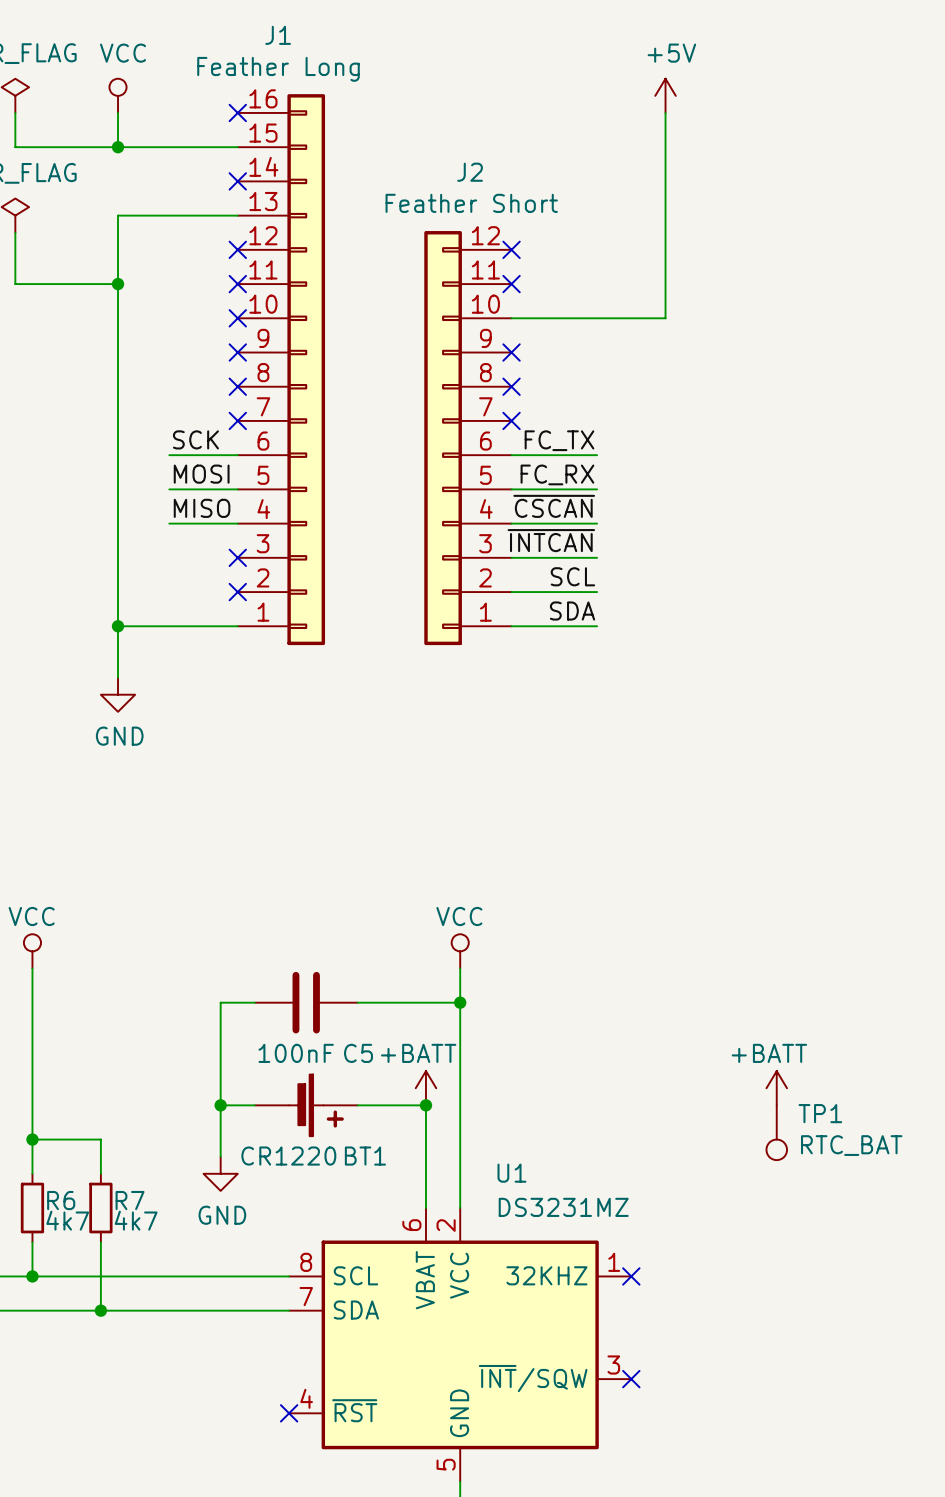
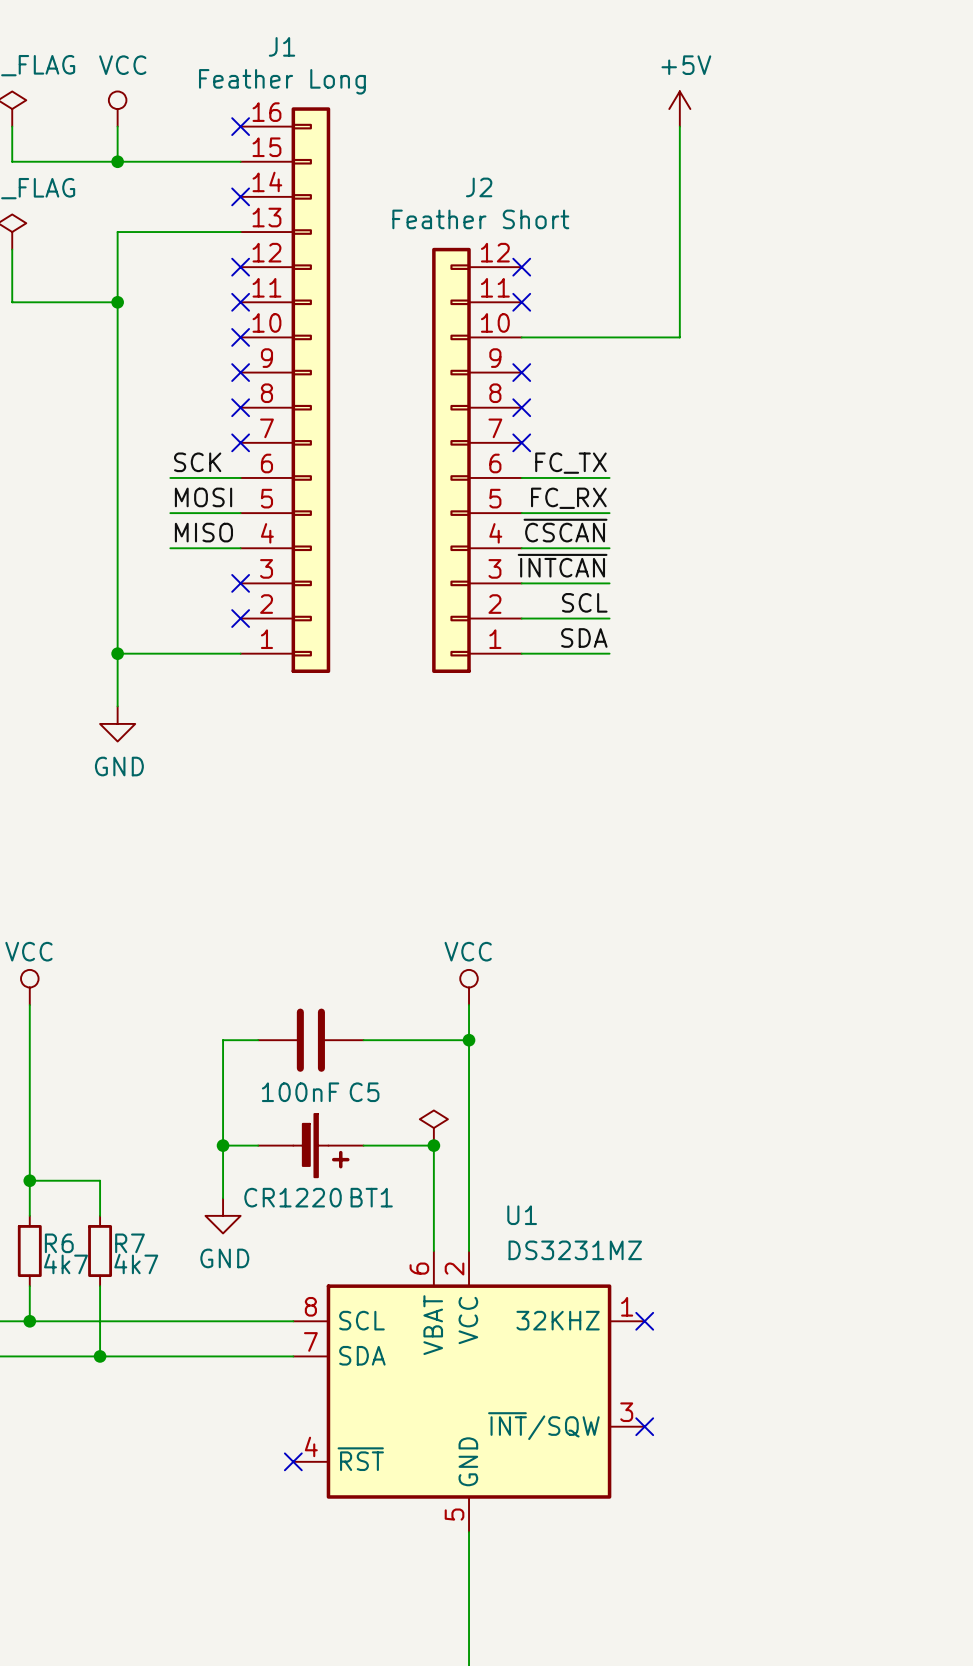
power symbol text: +BATT (418, 1053) -> none
power symbol shape: [415, 1071, 437, 1106] -> [419, 1110, 448, 1146]
power symbol: +BATT (776, 1088) -> none
TP1: RTC_BAT (776, 1132) -> none

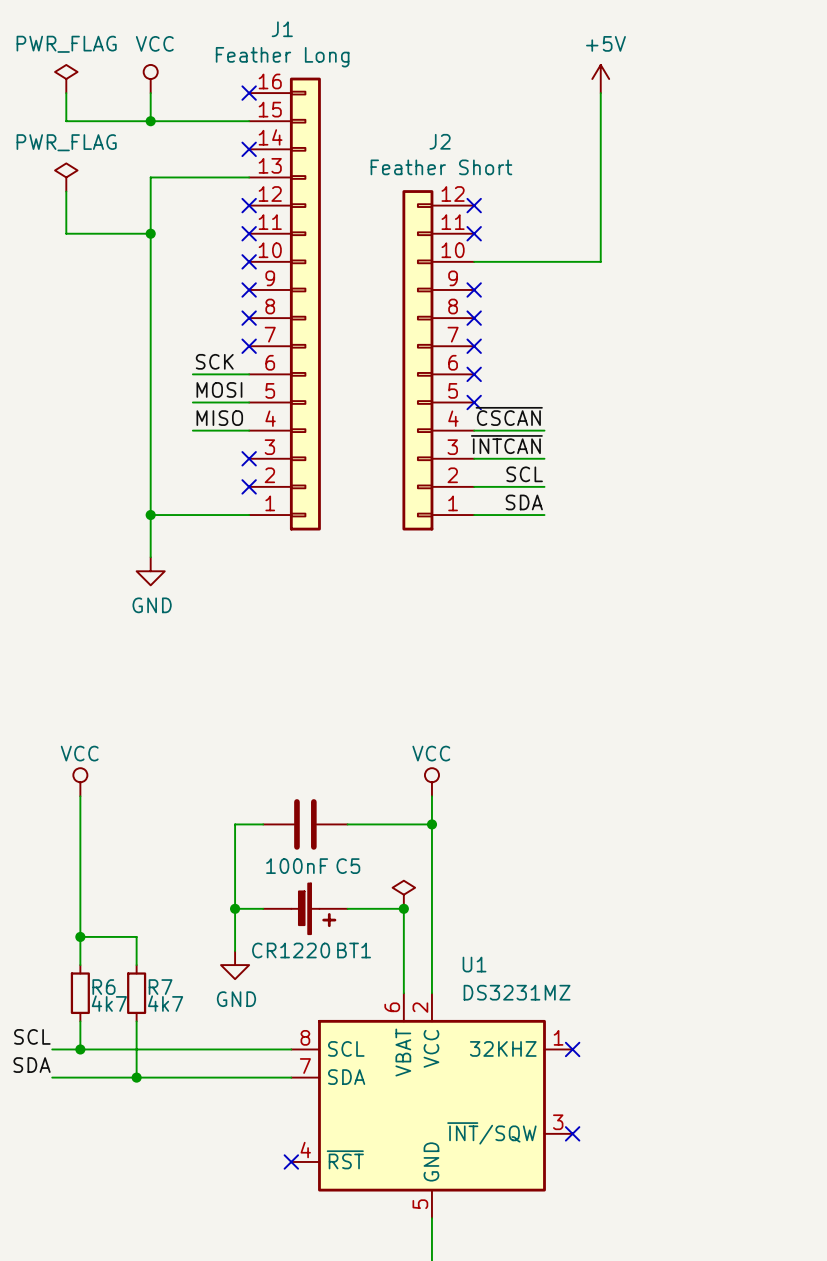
label: FC_TX (570, 463) -> none
wire: (521, 477) (609, 477) -> none
no-connect mark: none -> (474, 374)
label: FC_RX (568, 498) -> none
wire: (521, 513) (609, 513) -> none
no-connect mark: none -> (474, 402)

